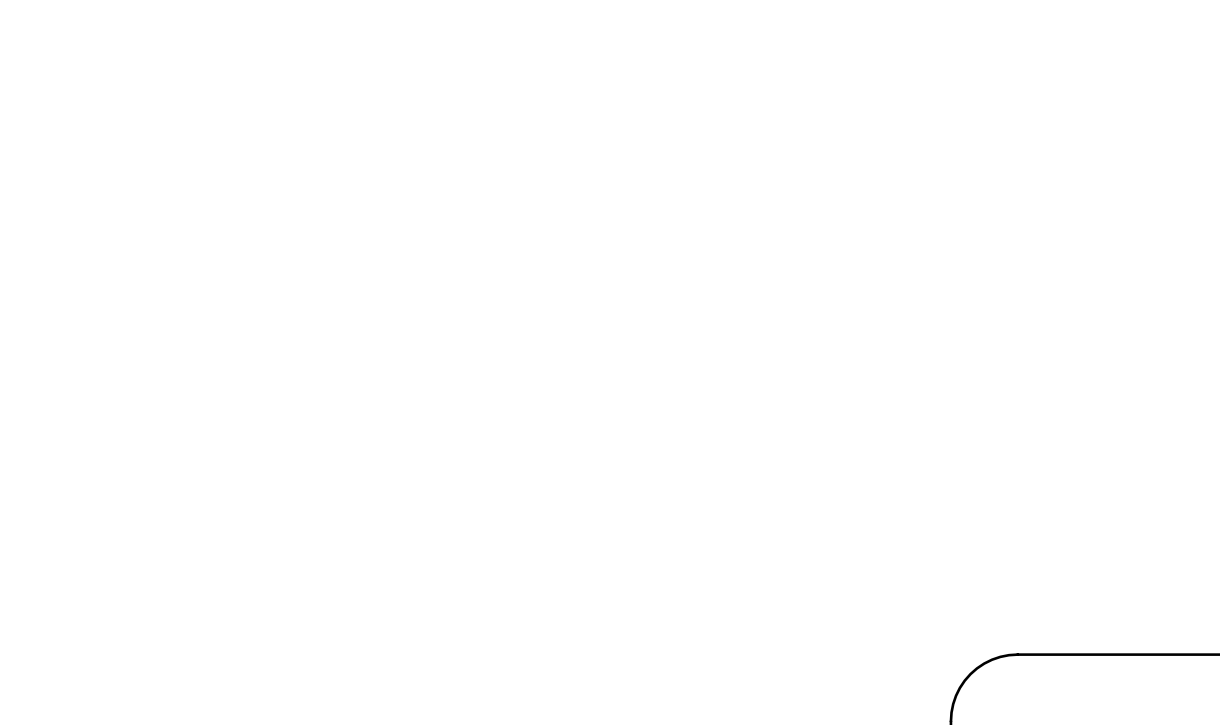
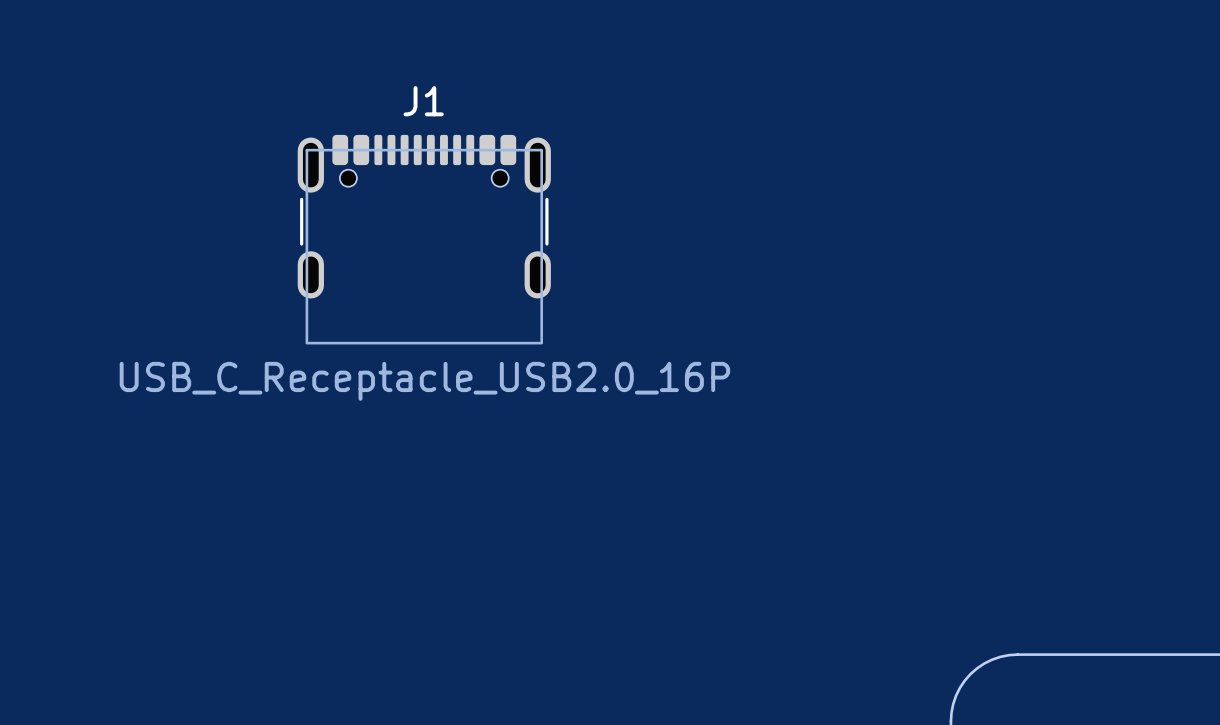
J1: none -> USB_C_Receptacle_USB2.0_16P (424, 239)

